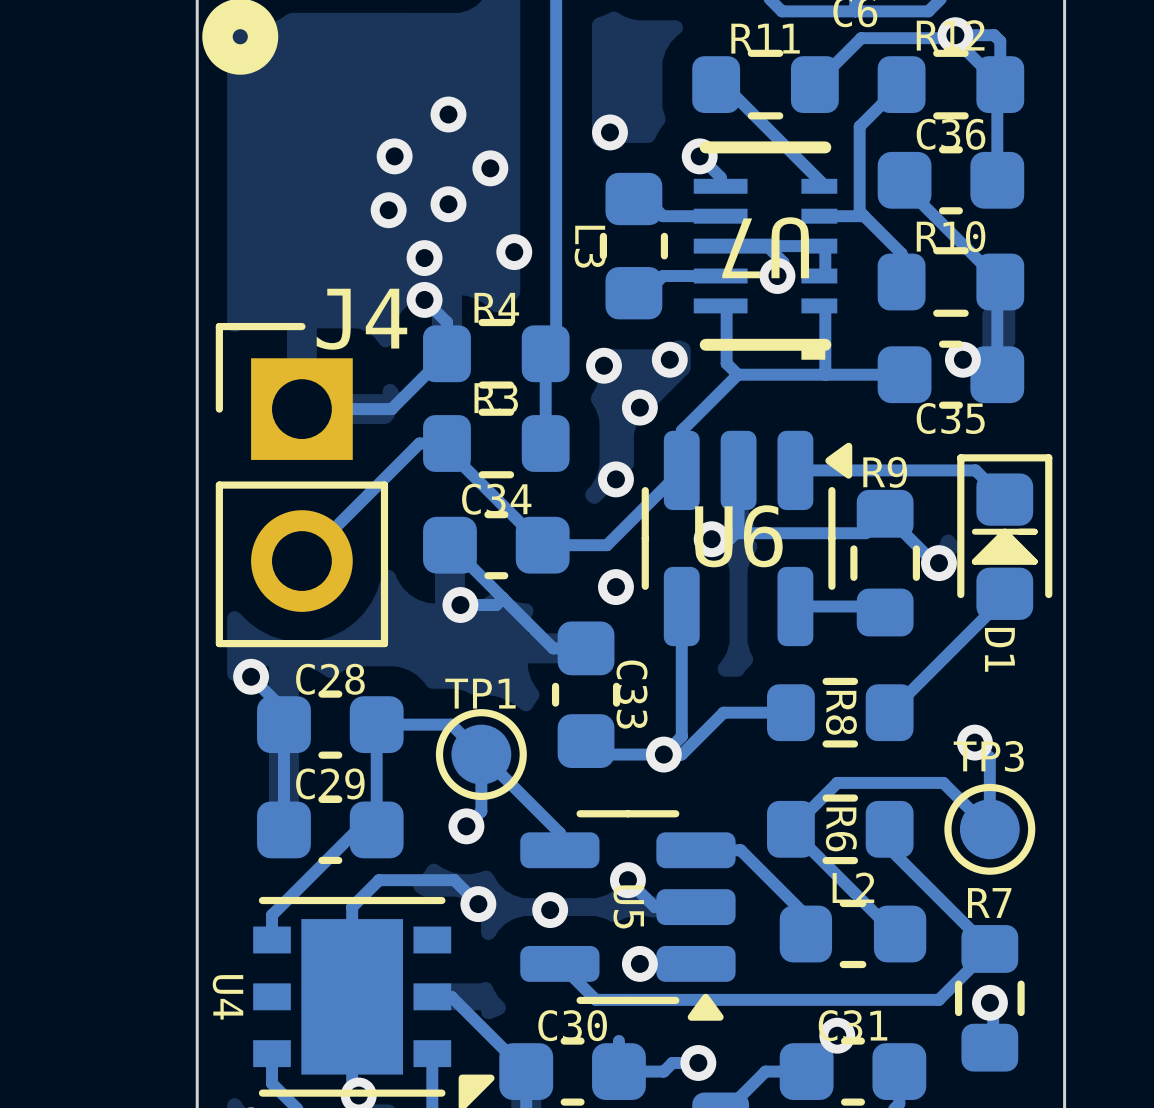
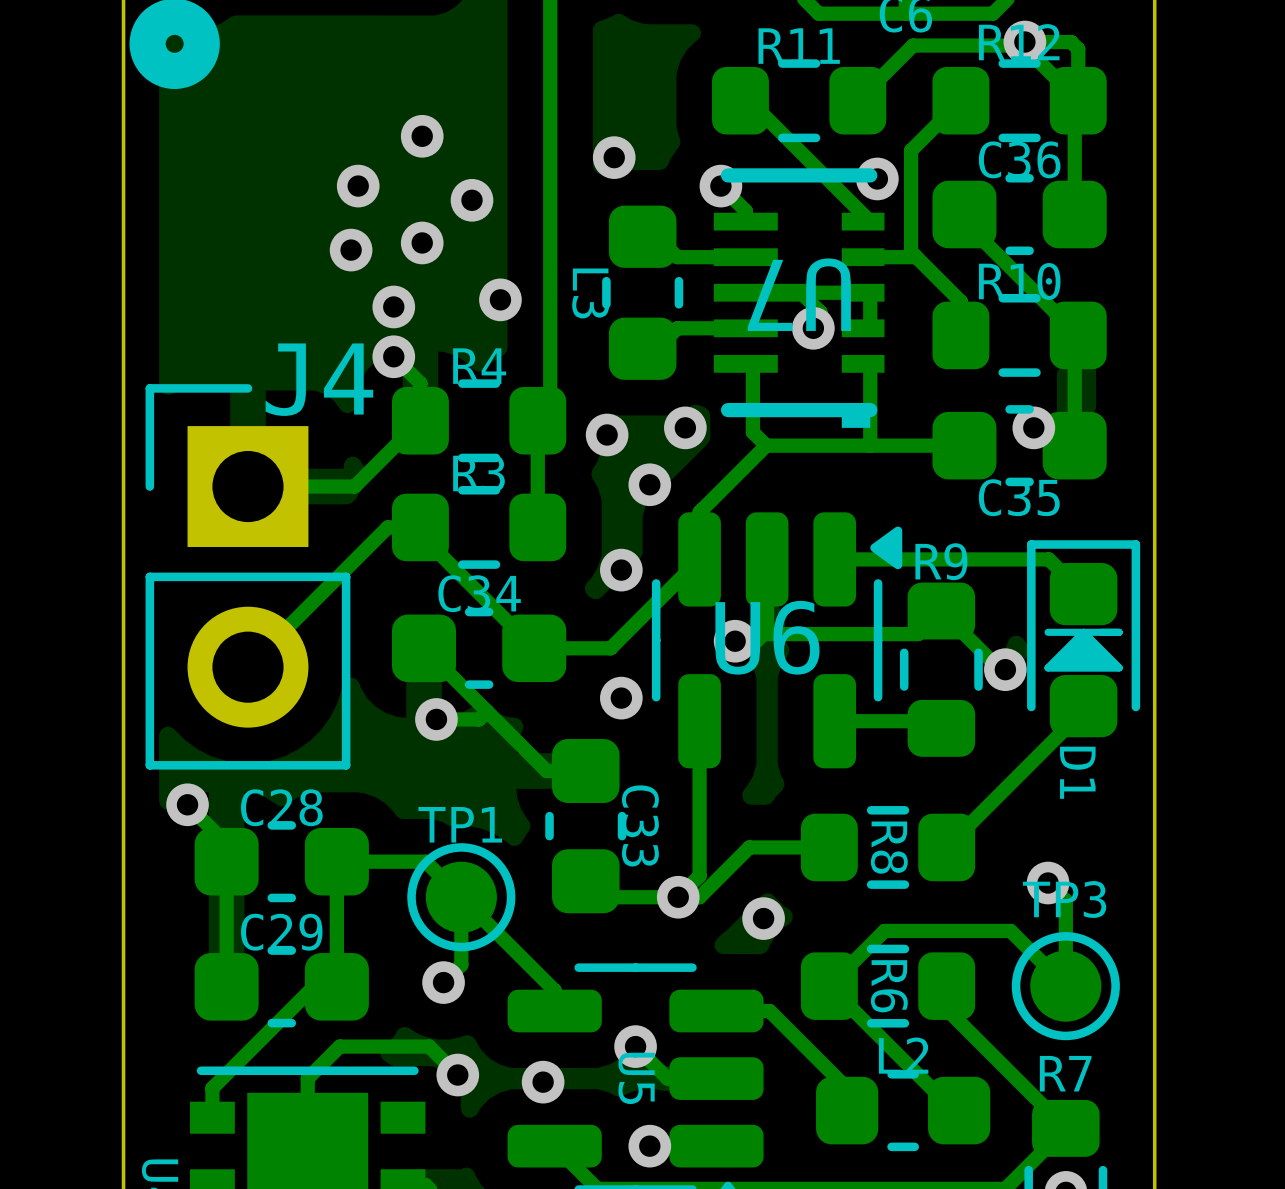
via: none -> (877, 178)
via: none -> (763, 918)

